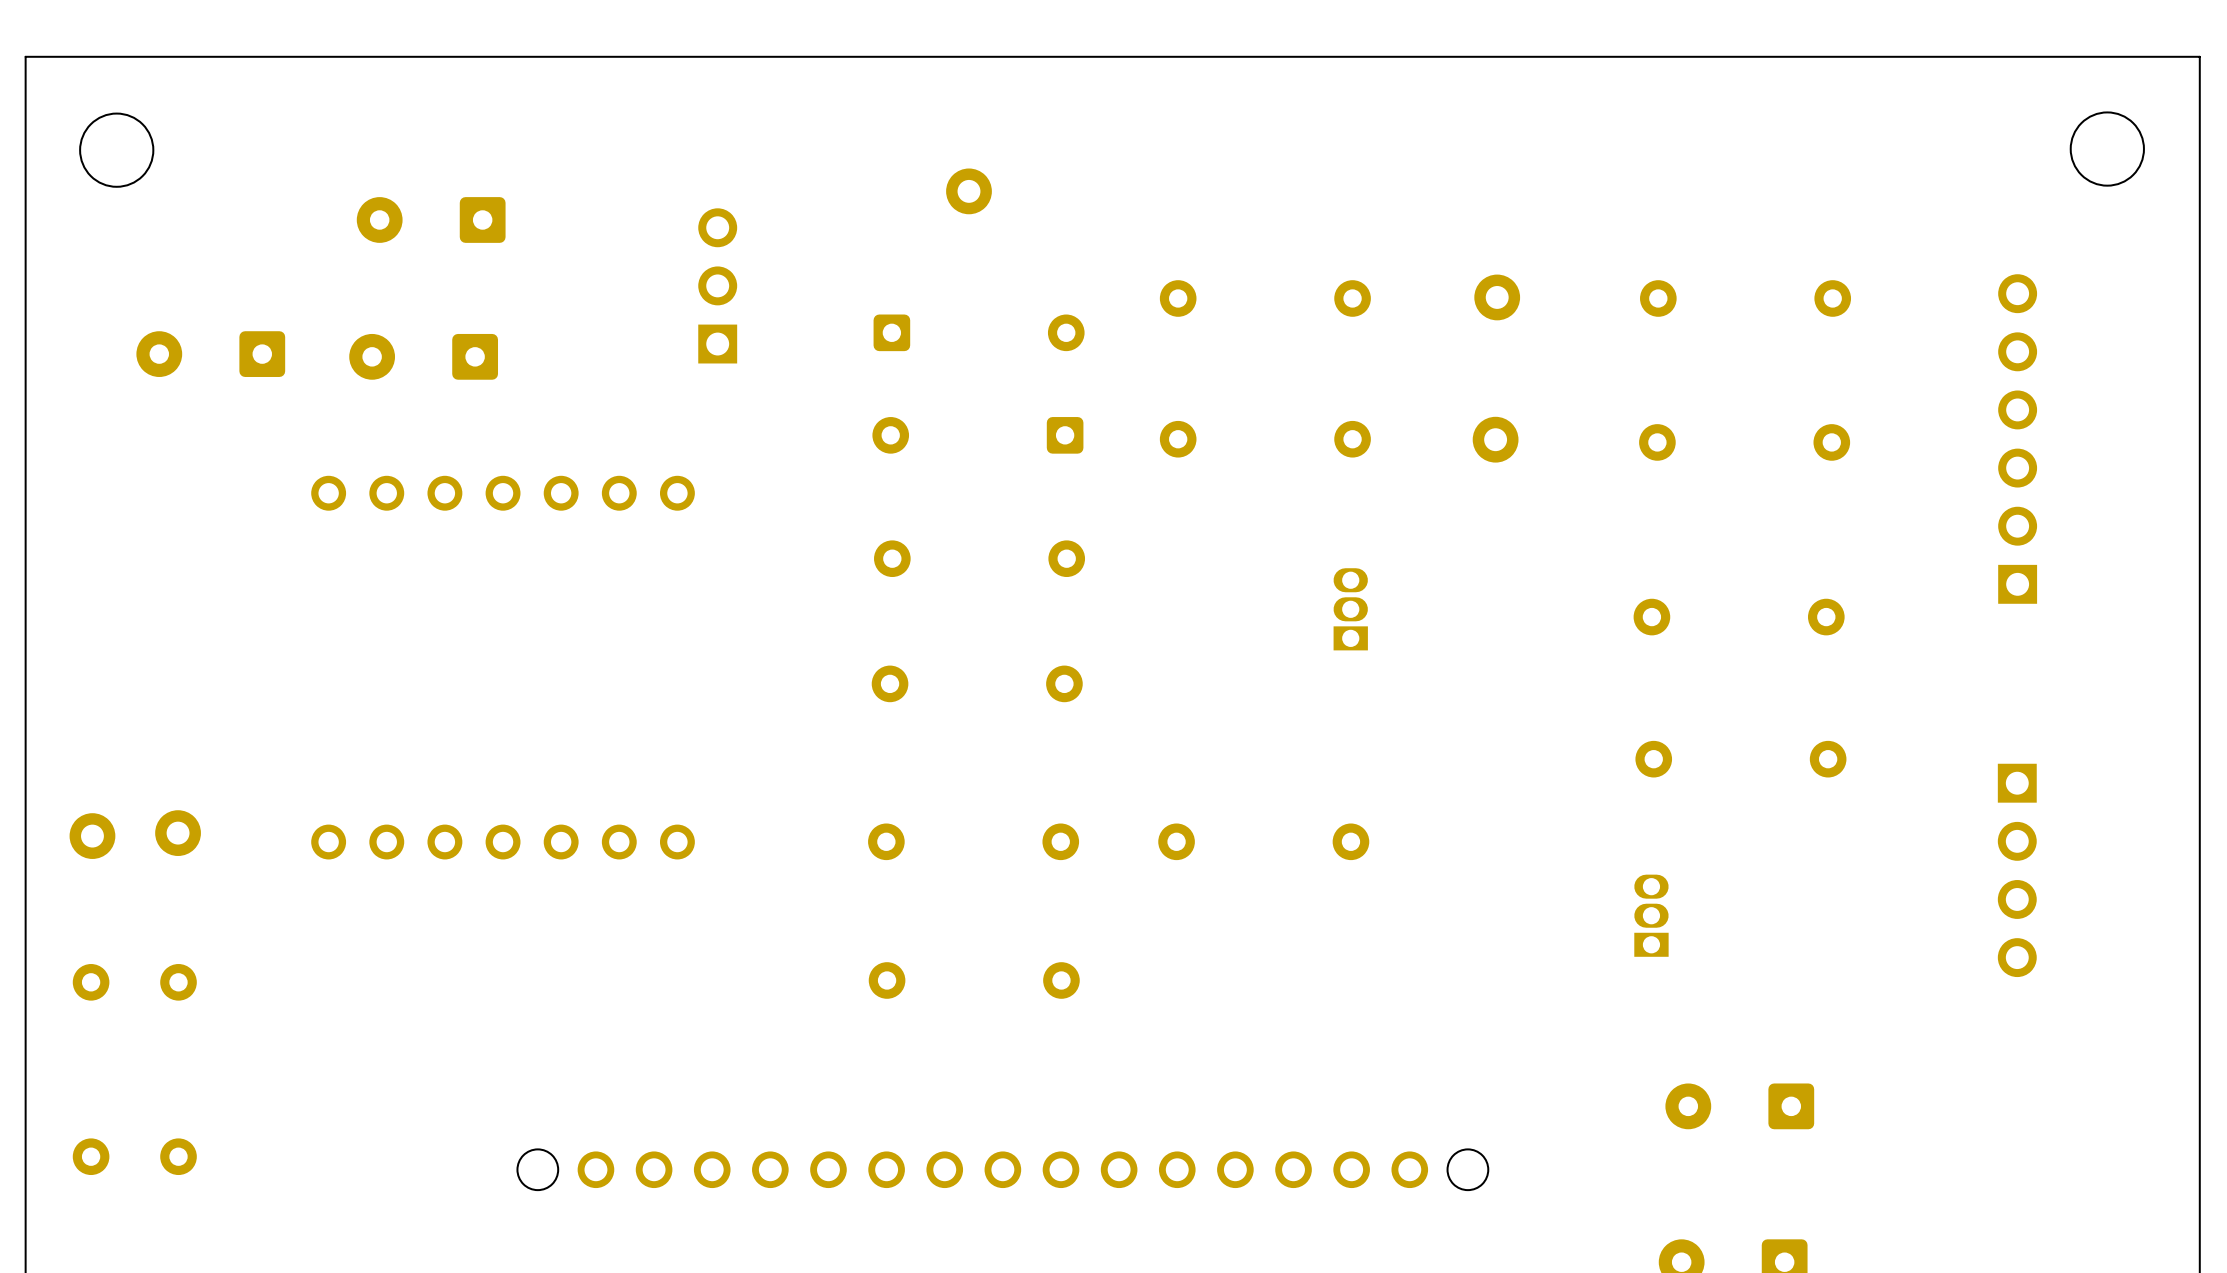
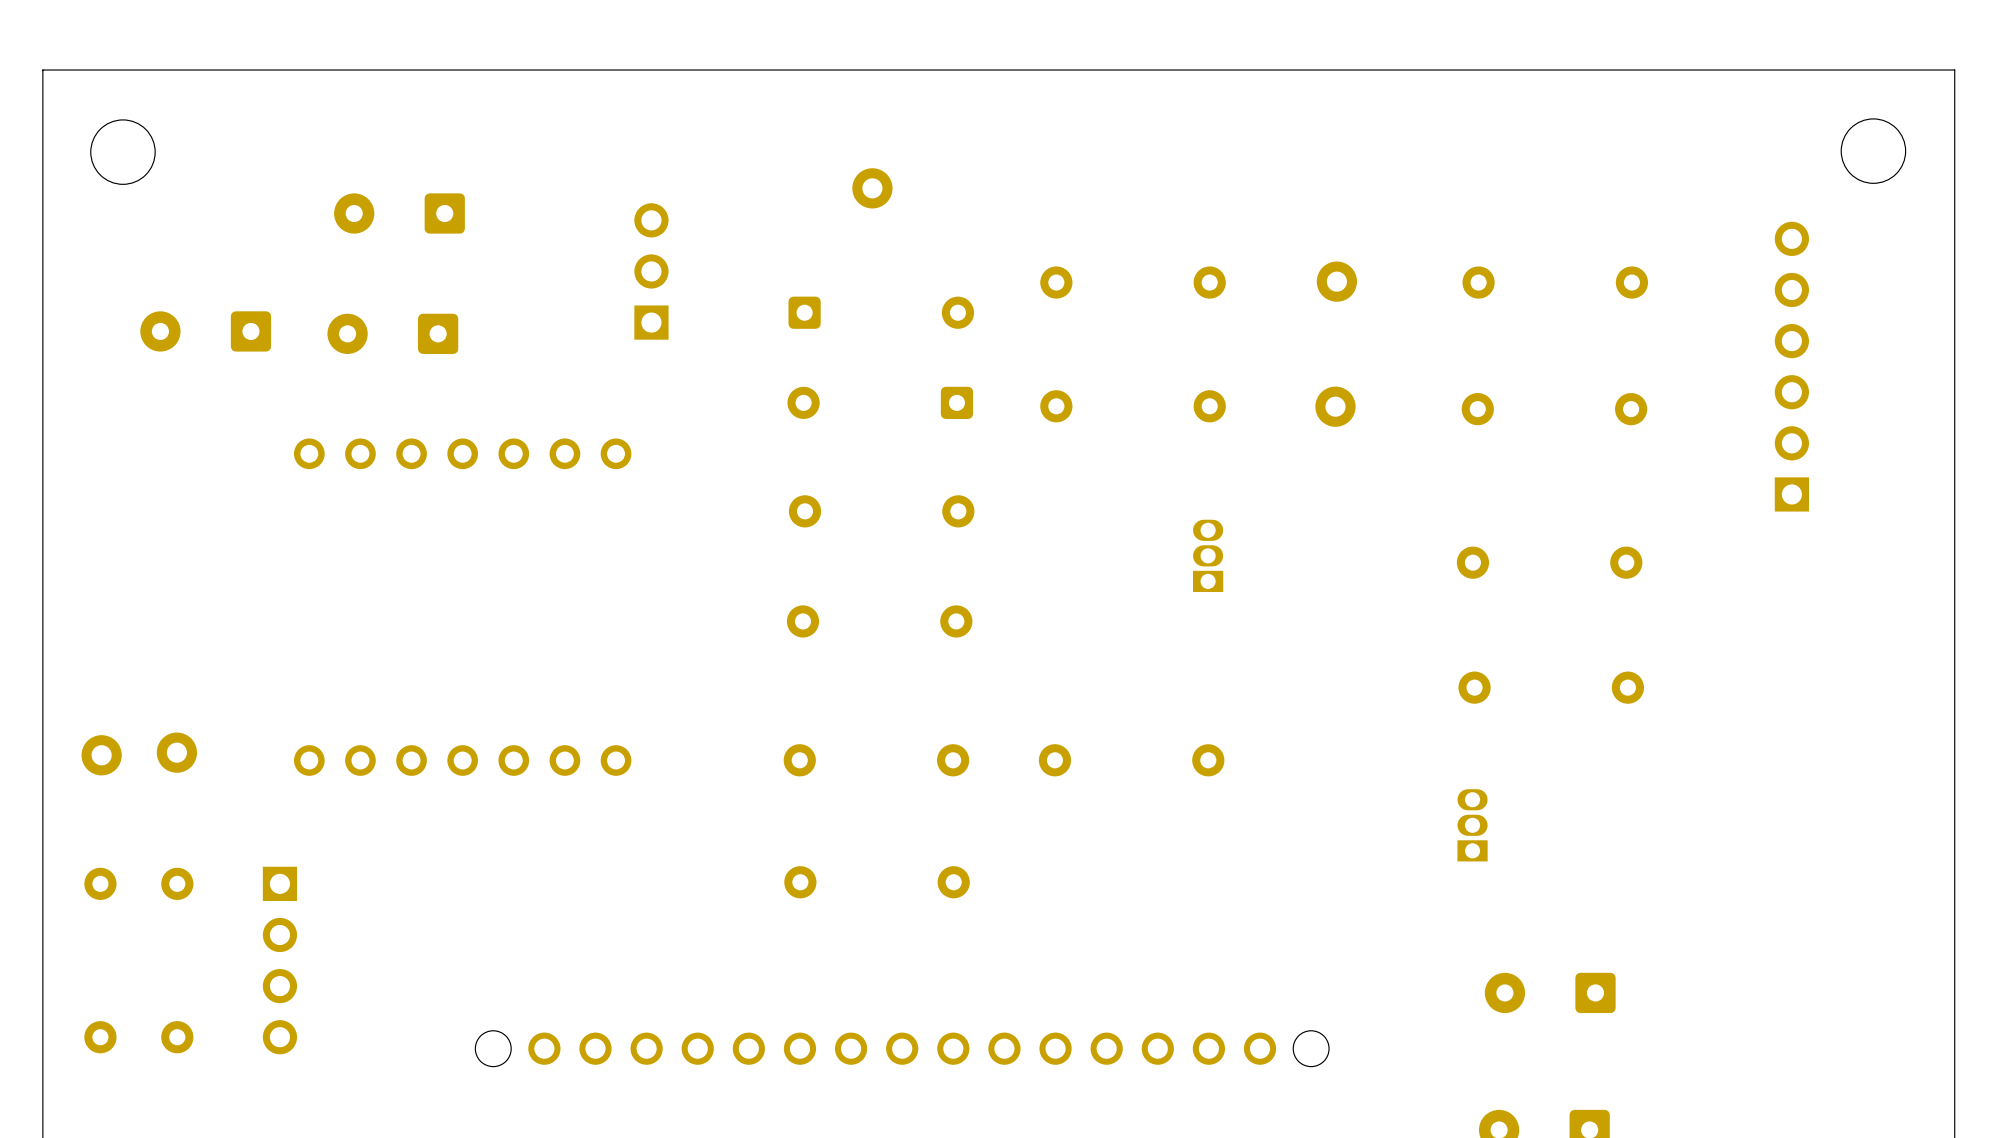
part position: (2017, 439) -> (1791, 366)
part: (2017, 870) -> none
part: none -> (279, 960)

